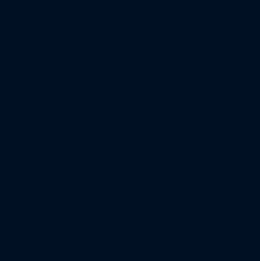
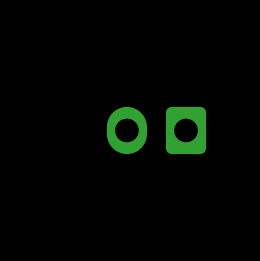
part: none -> (156, 130)

